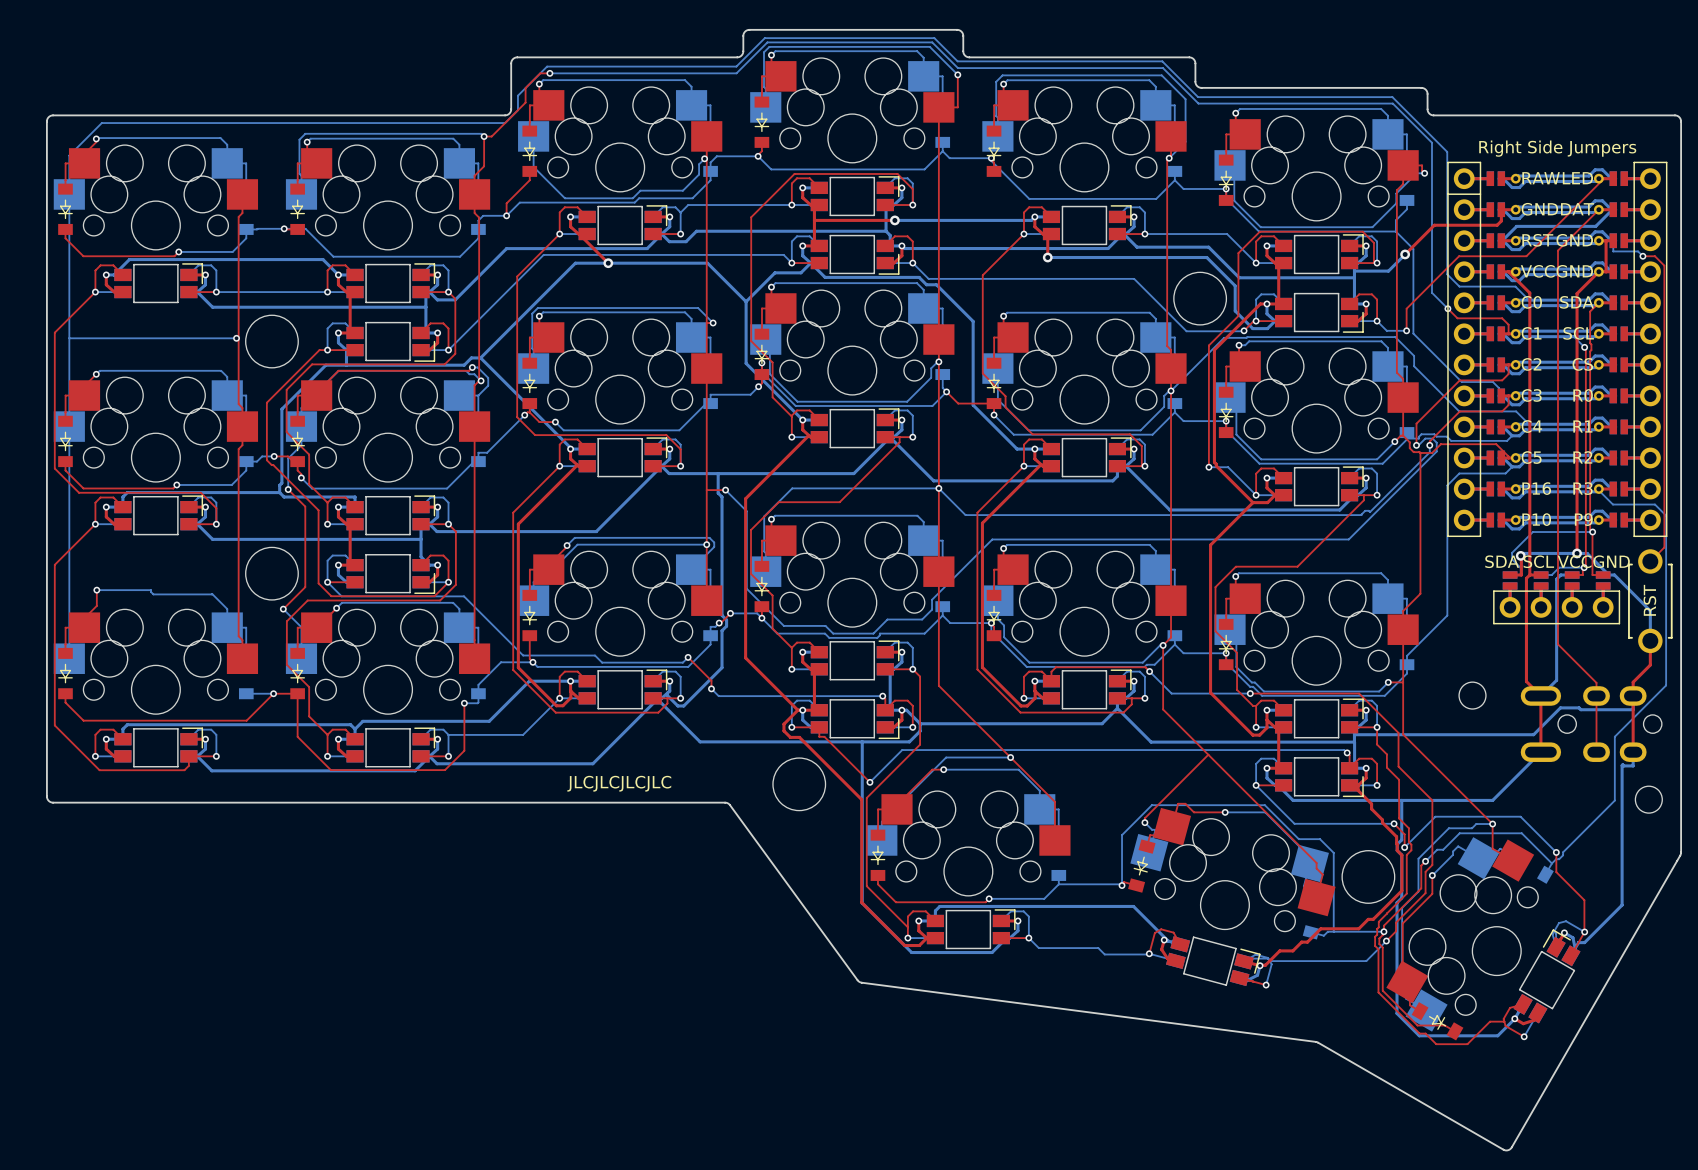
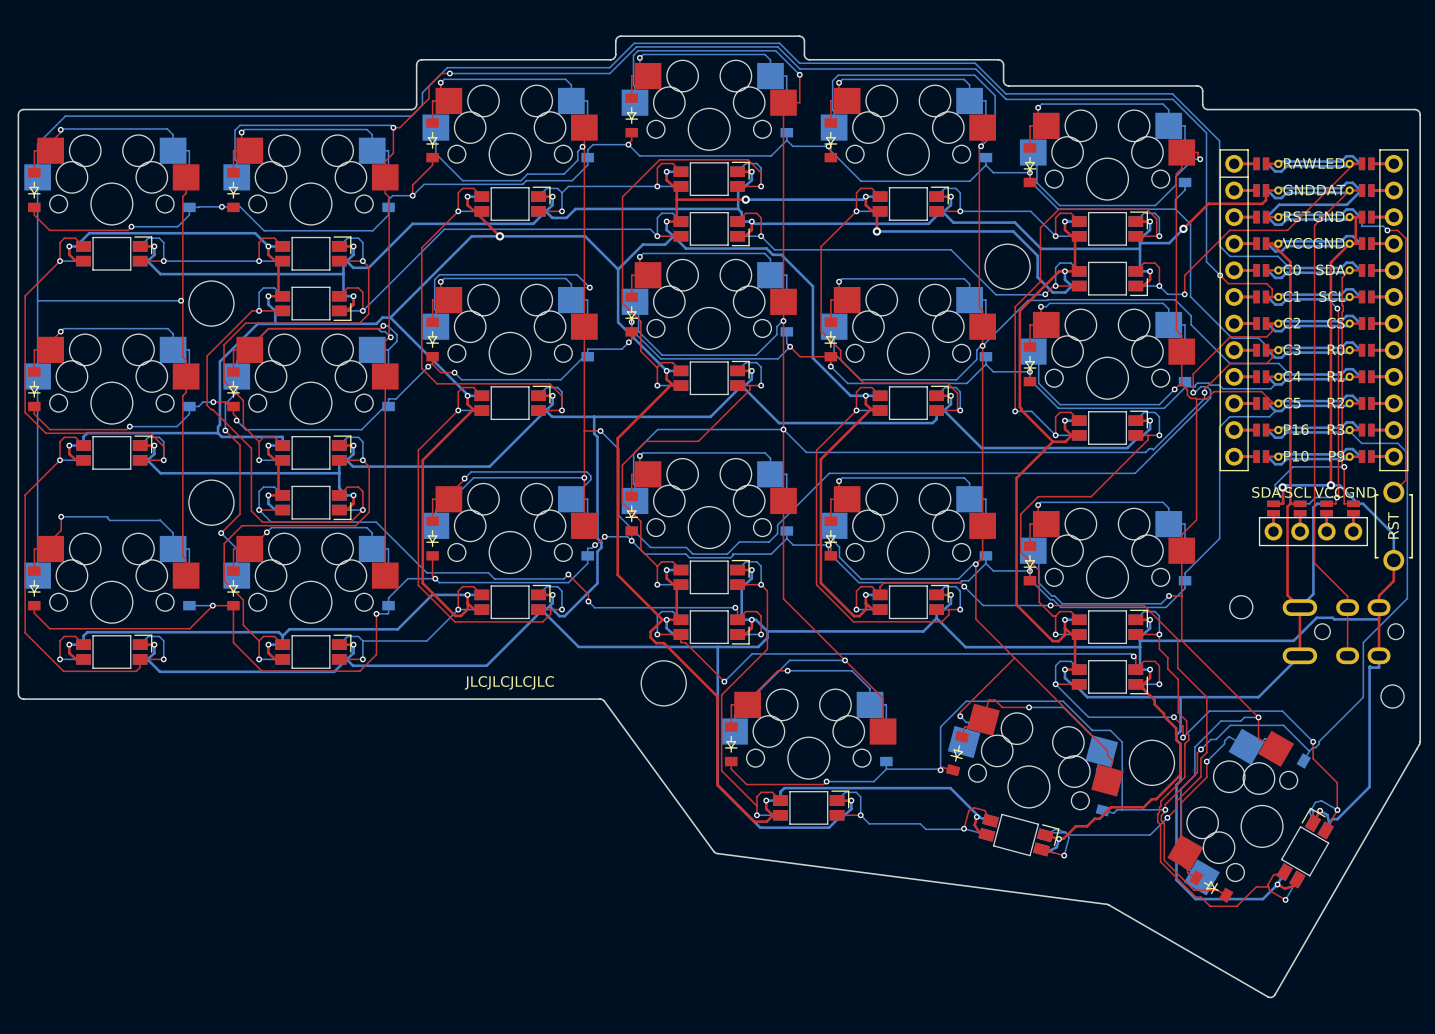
part text: Right Side Jumpers (1557, 148) -> none

